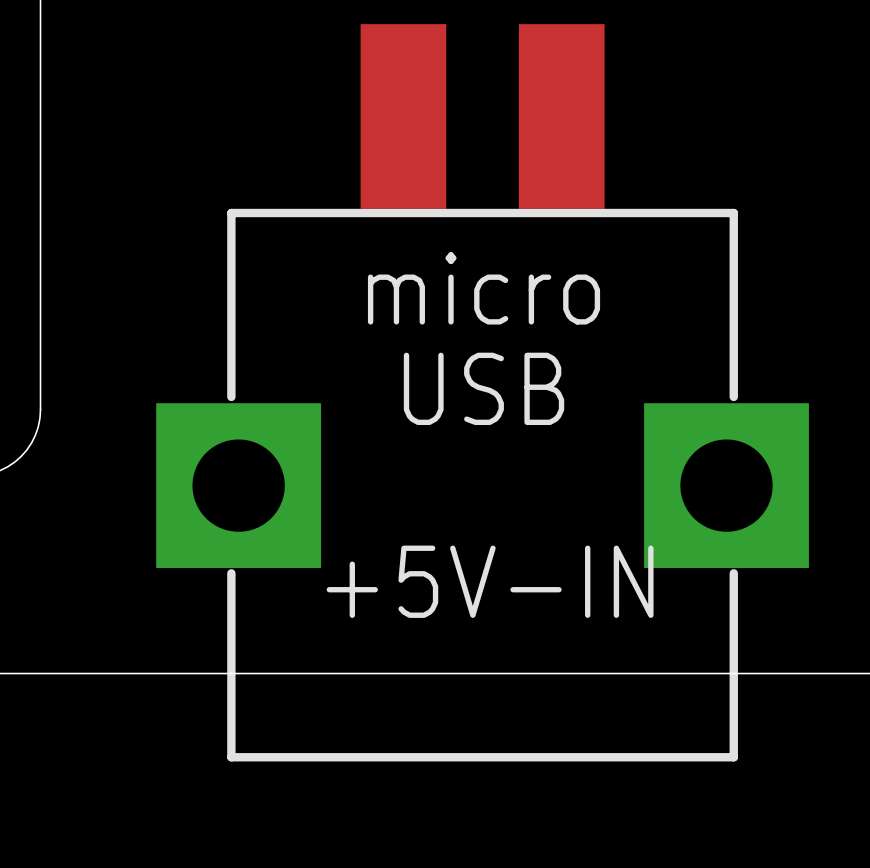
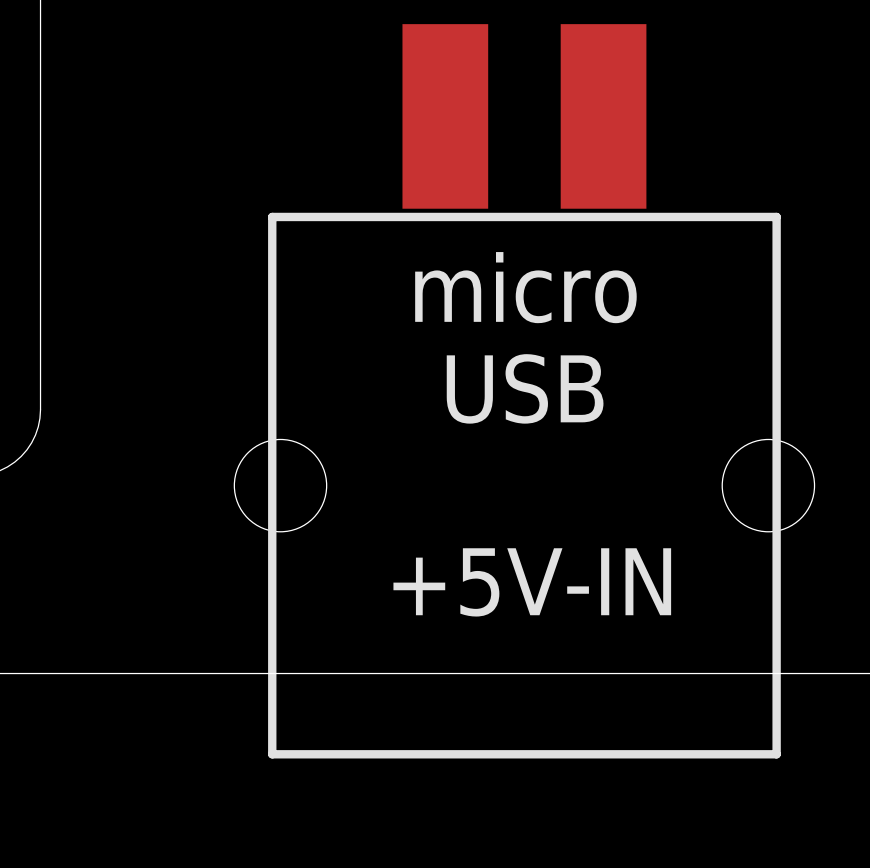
+5V-IN footprint: [156, 24, 809, 762] -> [234, 24, 815, 759]

